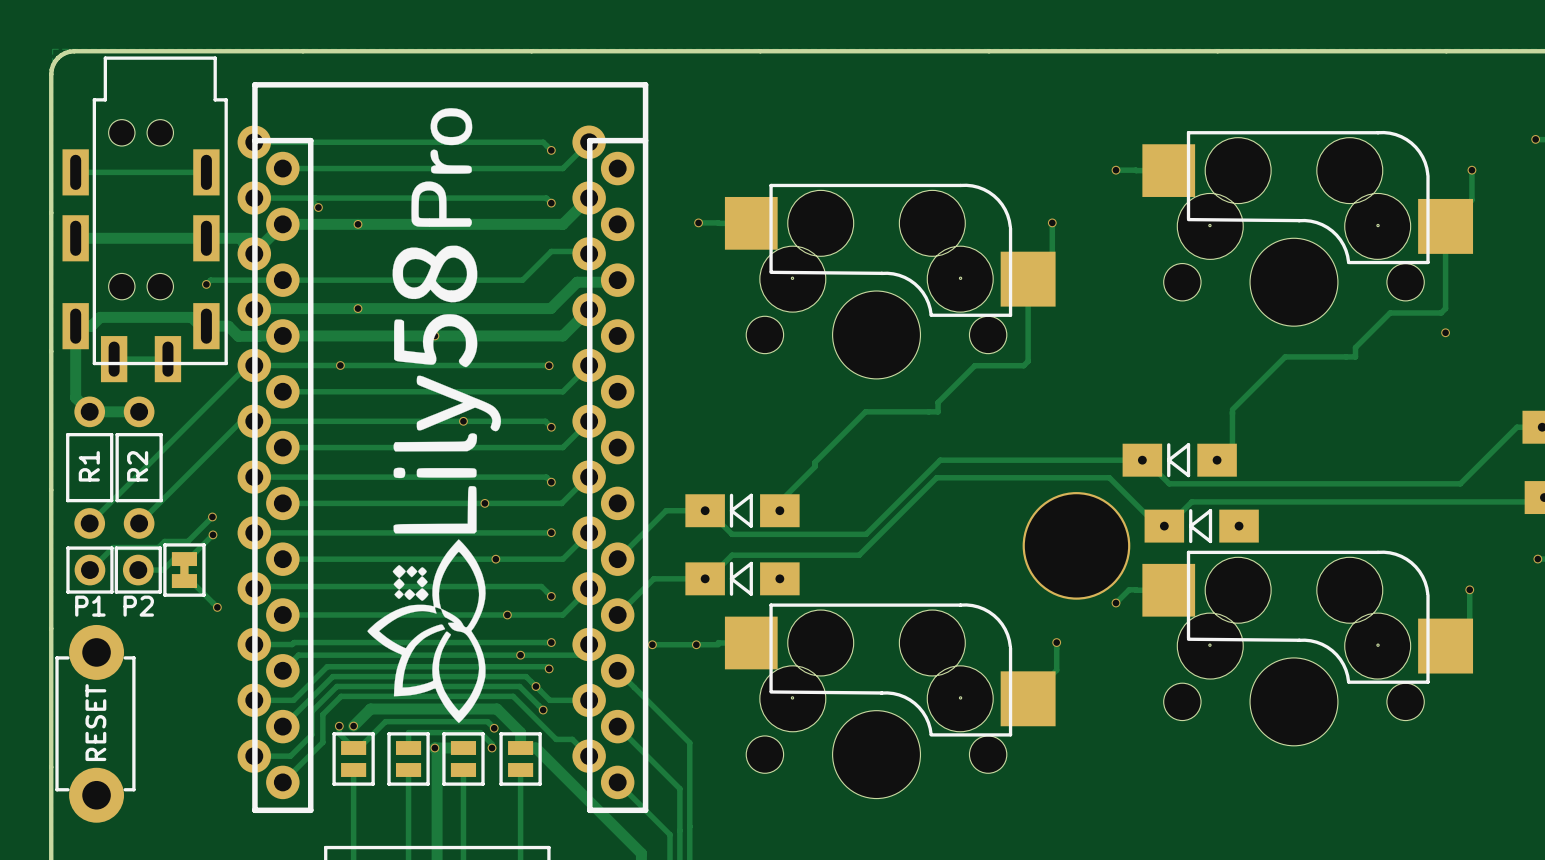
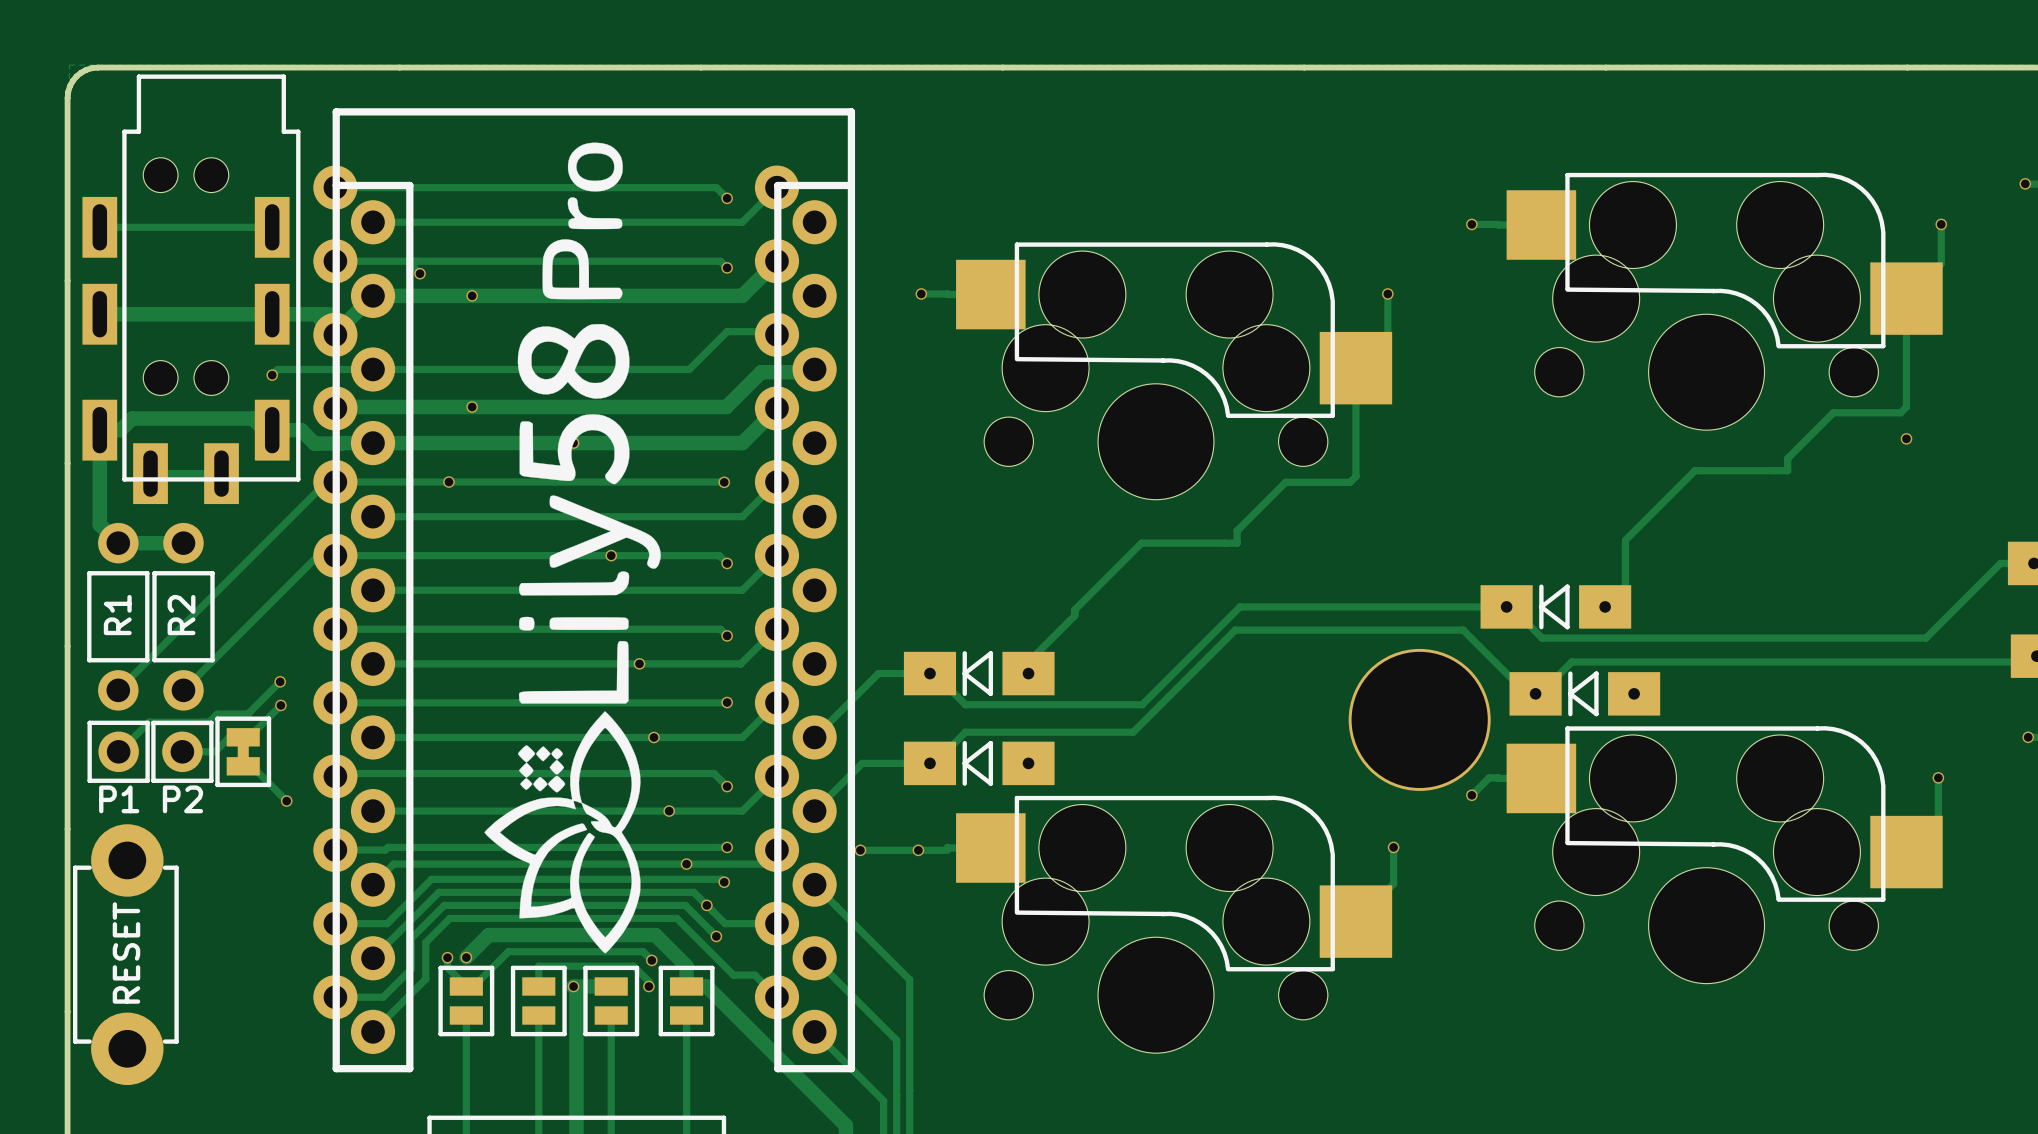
part footprint: [1142, 130, 1474, 327] -> [1506, 172, 1943, 431]
part footprint: [724, 183, 1056, 379] -> [956, 242, 1393, 500]
part footprint: [1142, 550, 1474, 746] -> [1506, 726, 1943, 984]
part footprint: [724, 603, 1056, 799] -> [956, 795, 1393, 1054]

